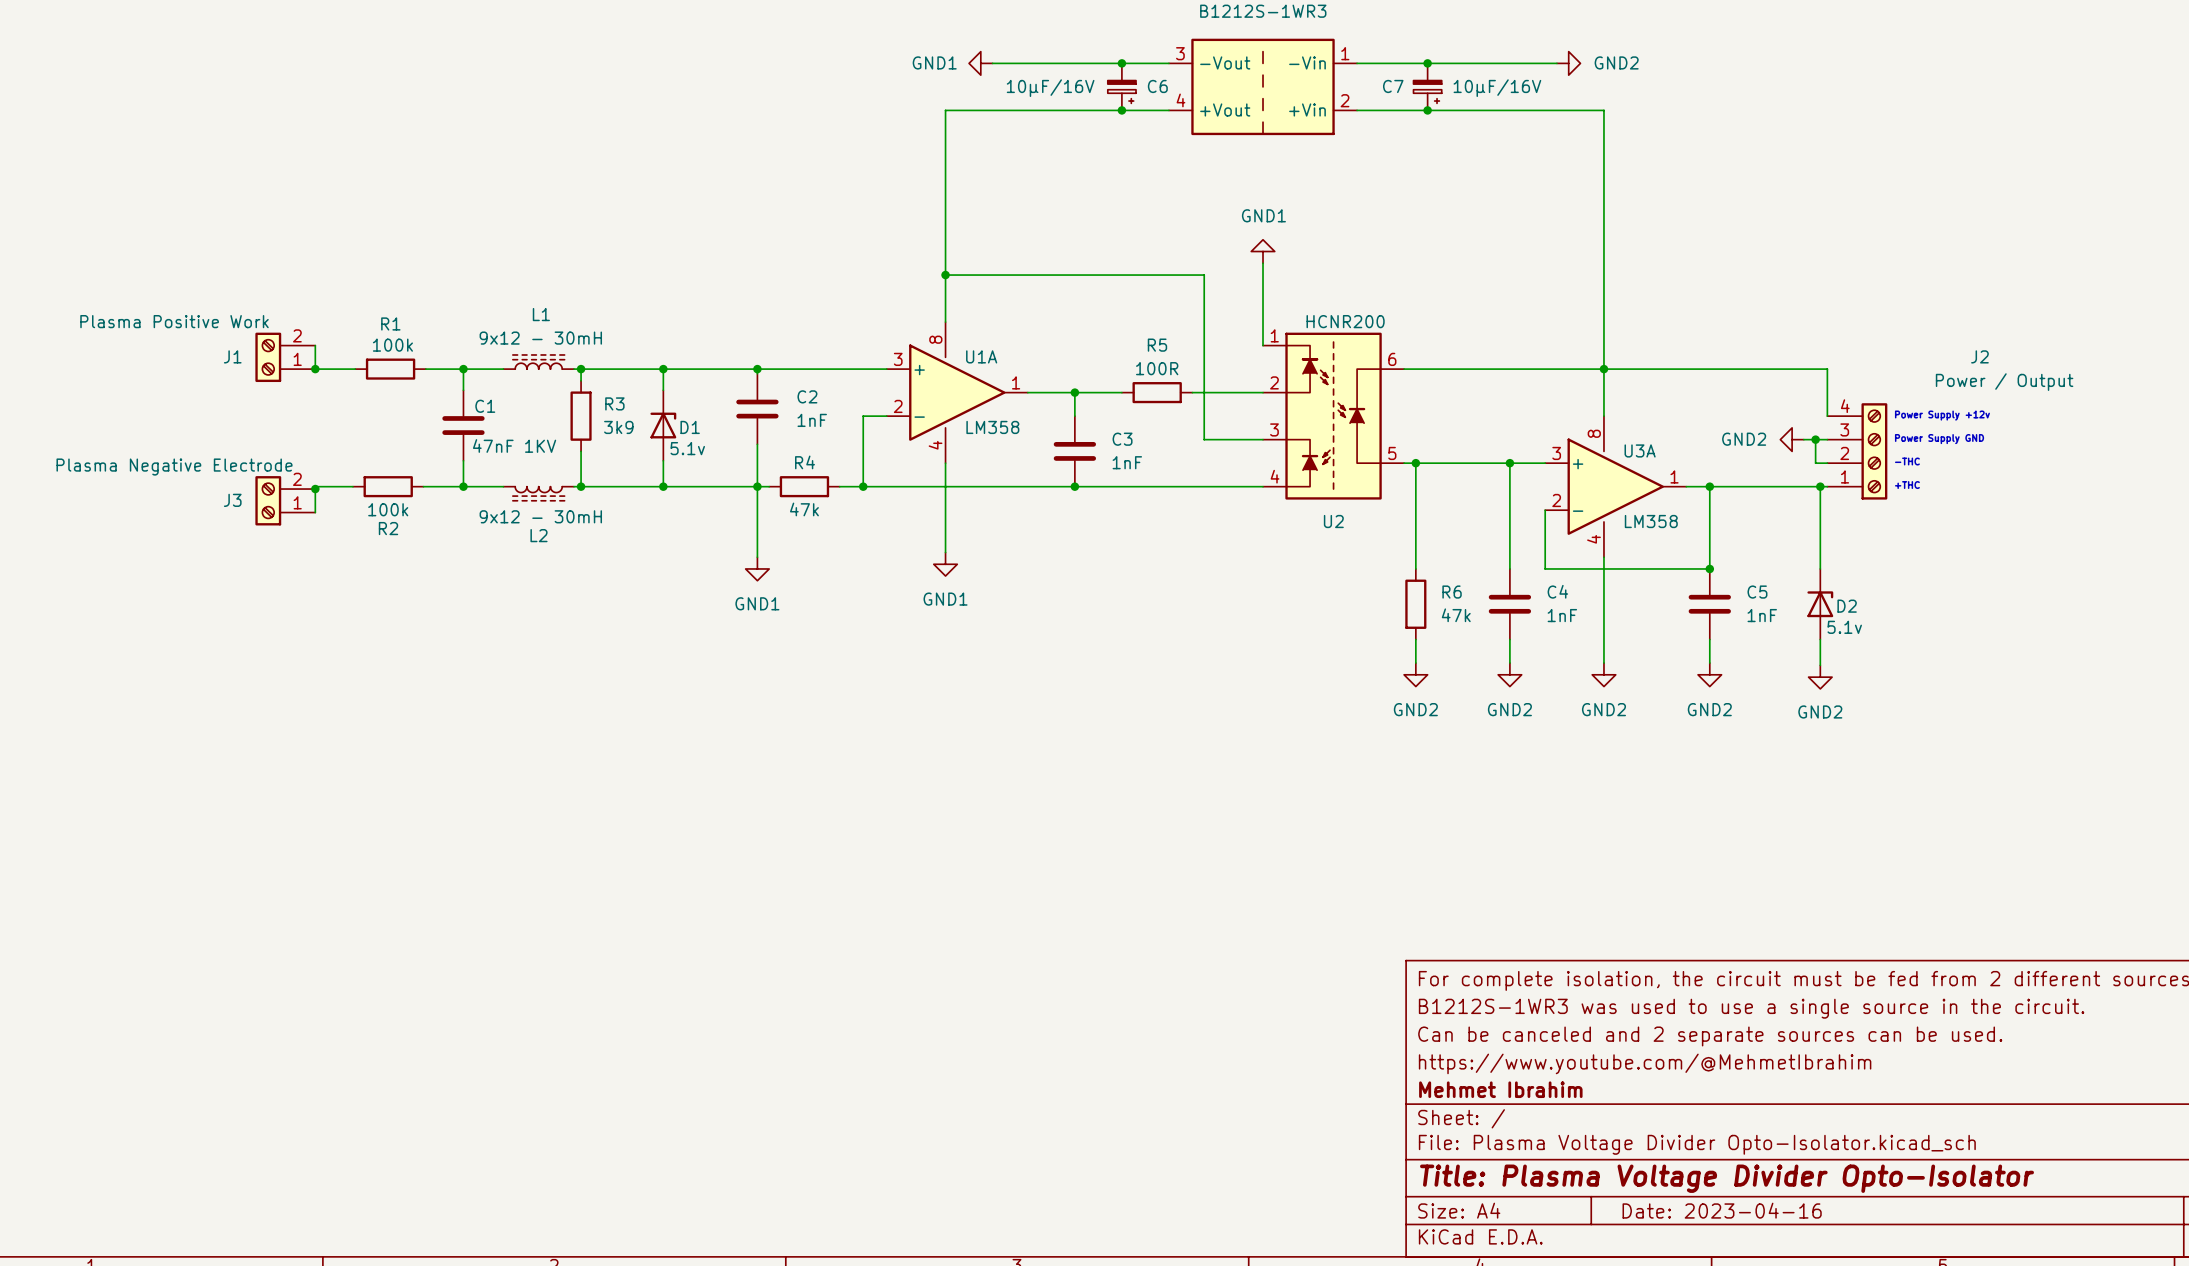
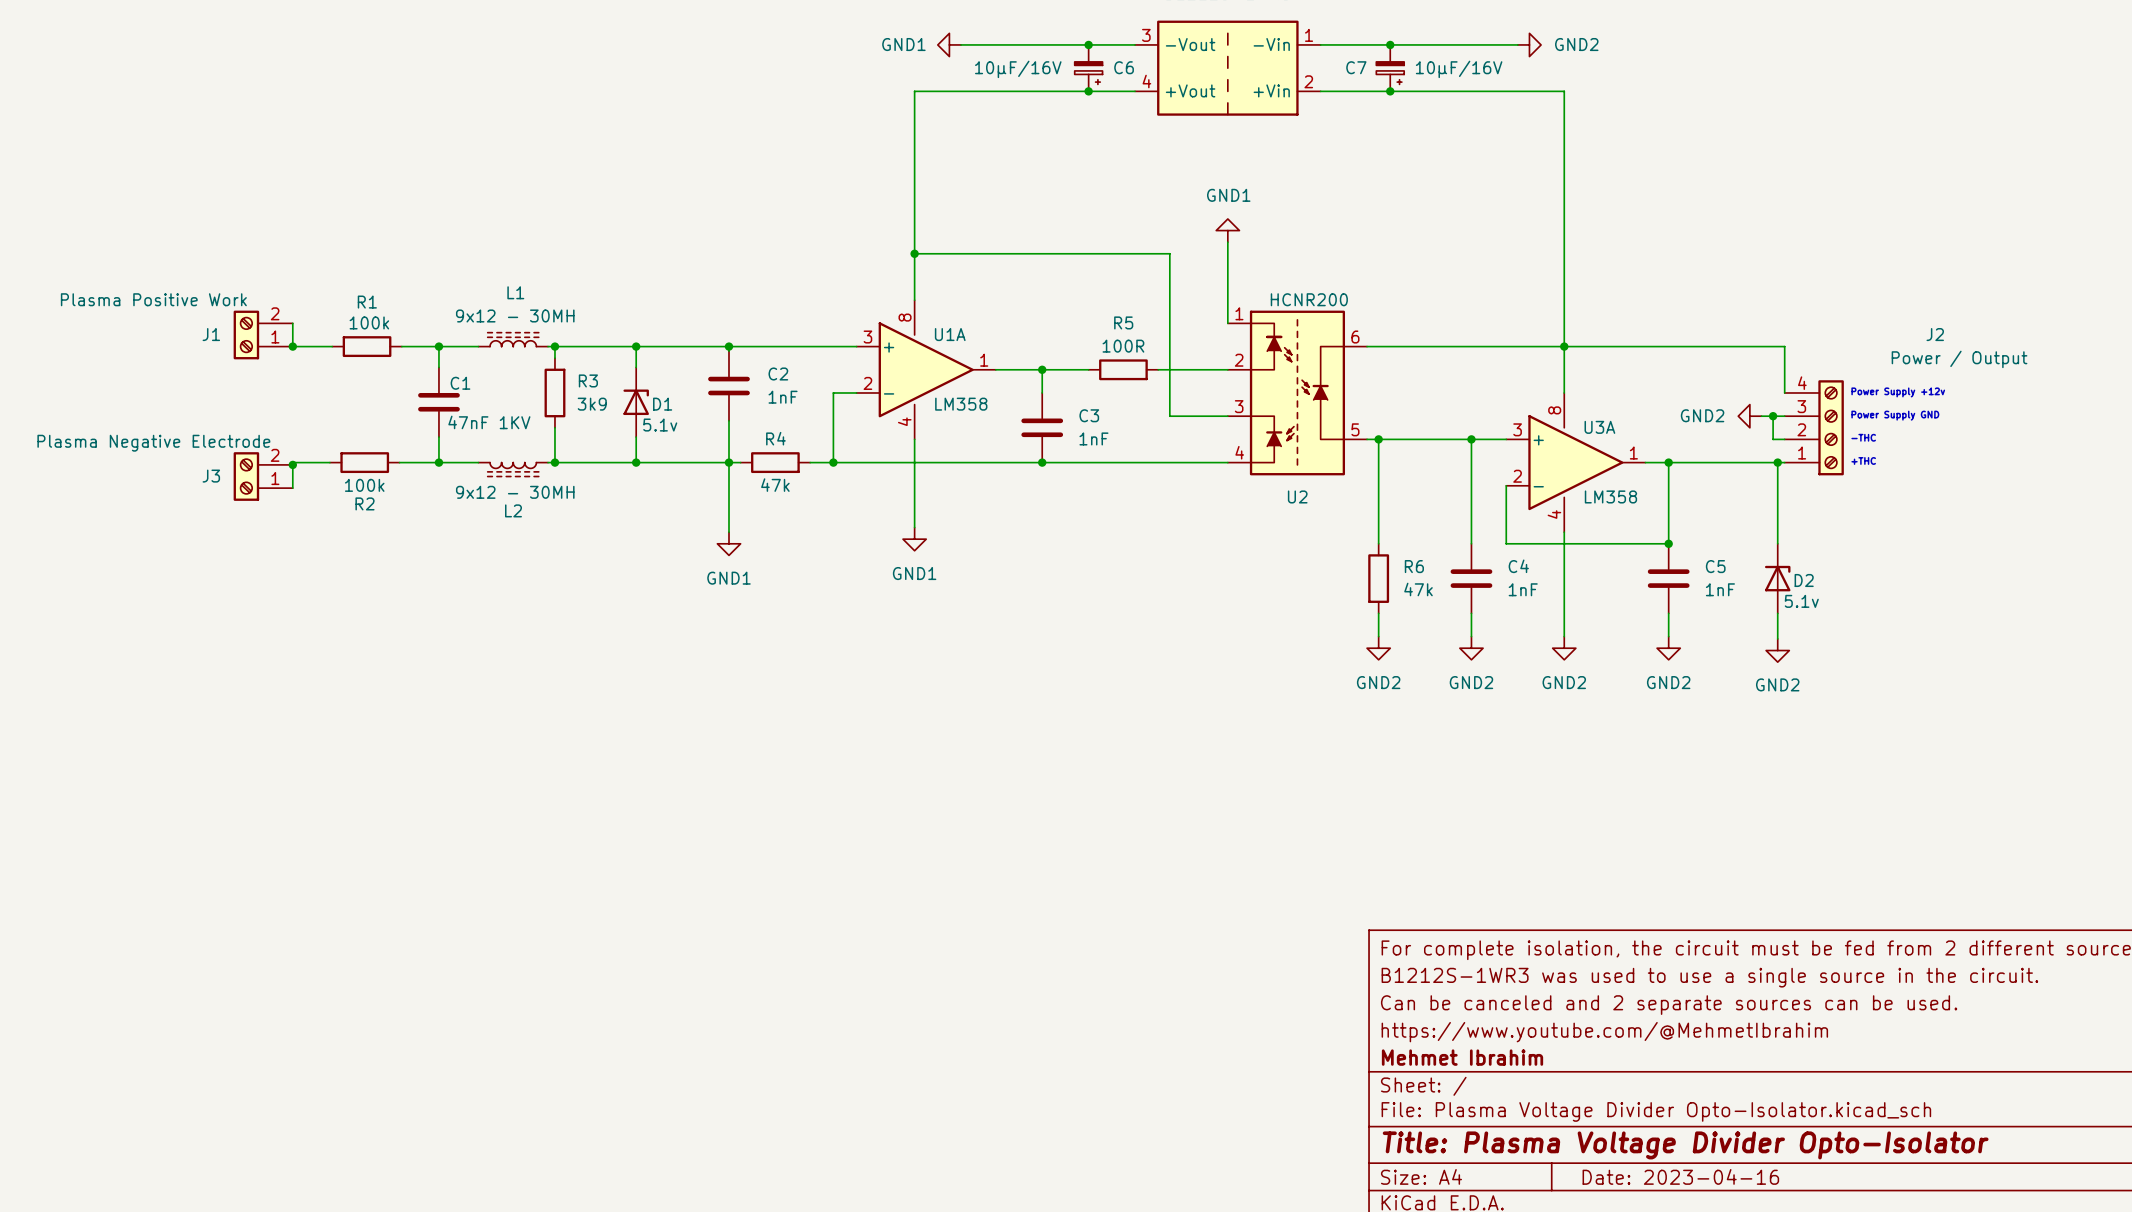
L1 value: 9x12 - 30mH (540, 338) -> 9x12 - 30MH (515, 315)
L2 value: 9x12 - 30mH (540, 516) -> 9x12 - 30MH (515, 492)

